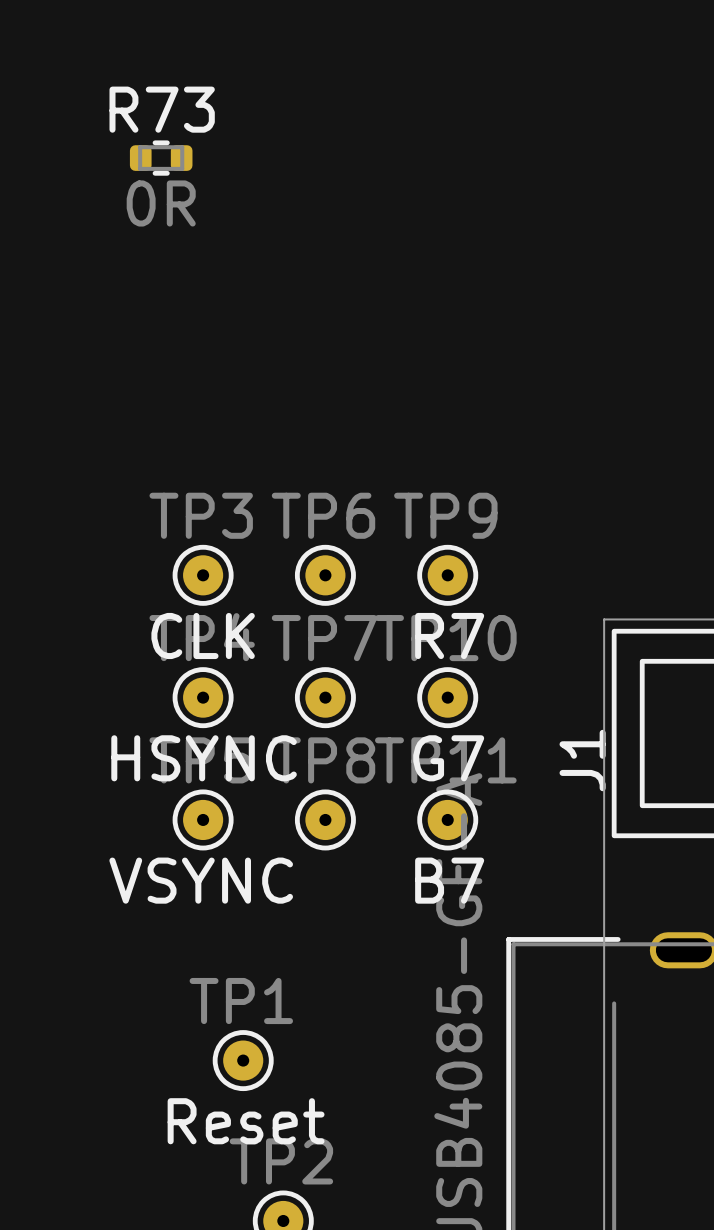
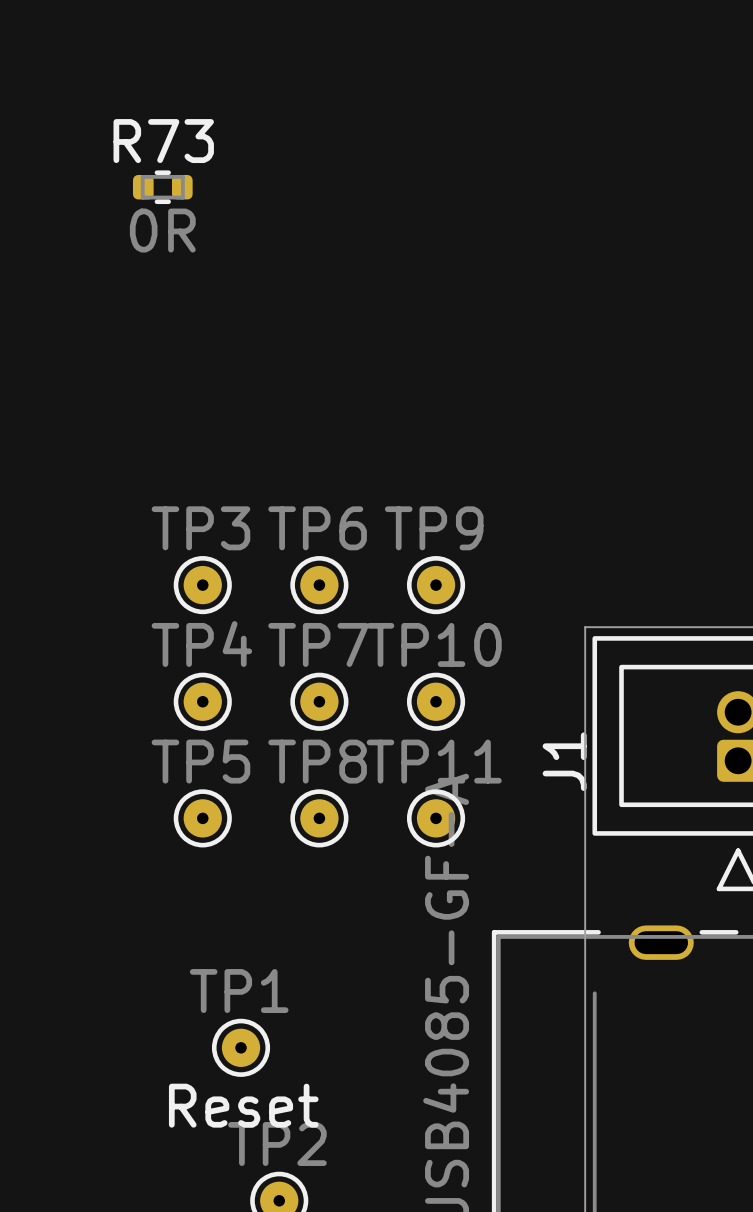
TP3 value: CLK (203, 635) -> none
TP9 value: R7 (449, 635) -> none
TP4 value: HSYNC (204, 758) -> none
TP10 value: G7 (448, 758) -> none
TP5 value: VSYNC (201, 880) -> none
TP11 value: B7 (449, 880) -> none

